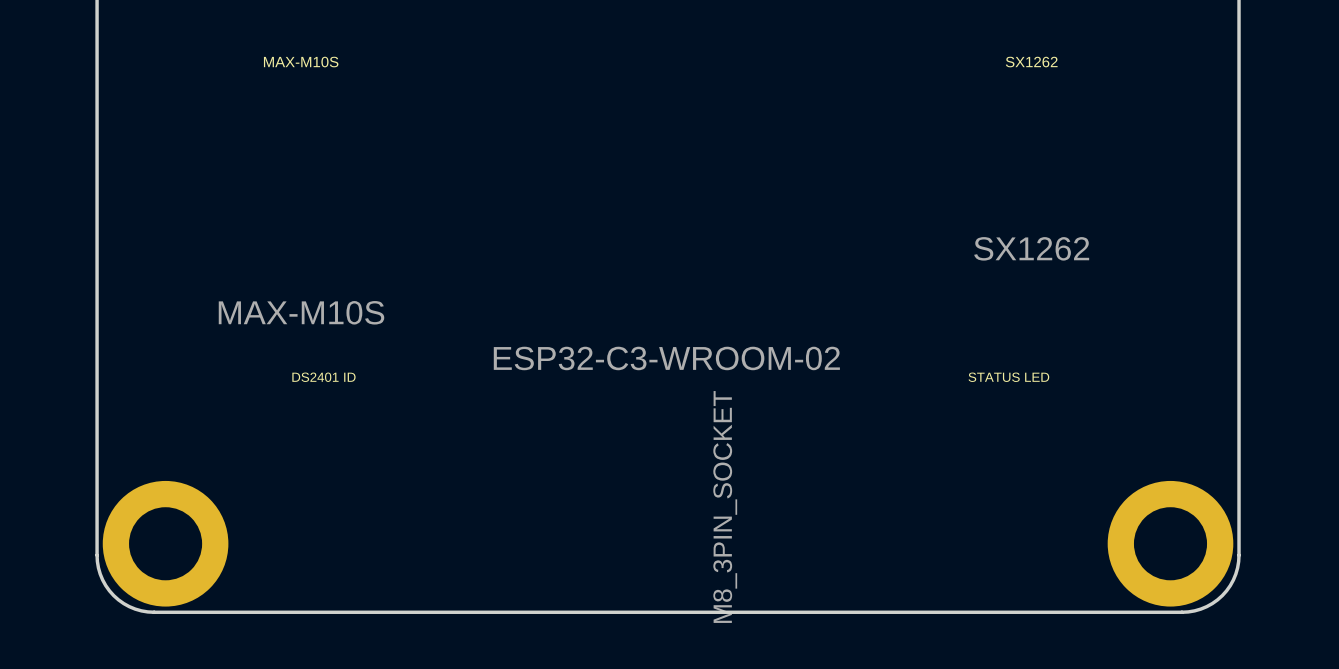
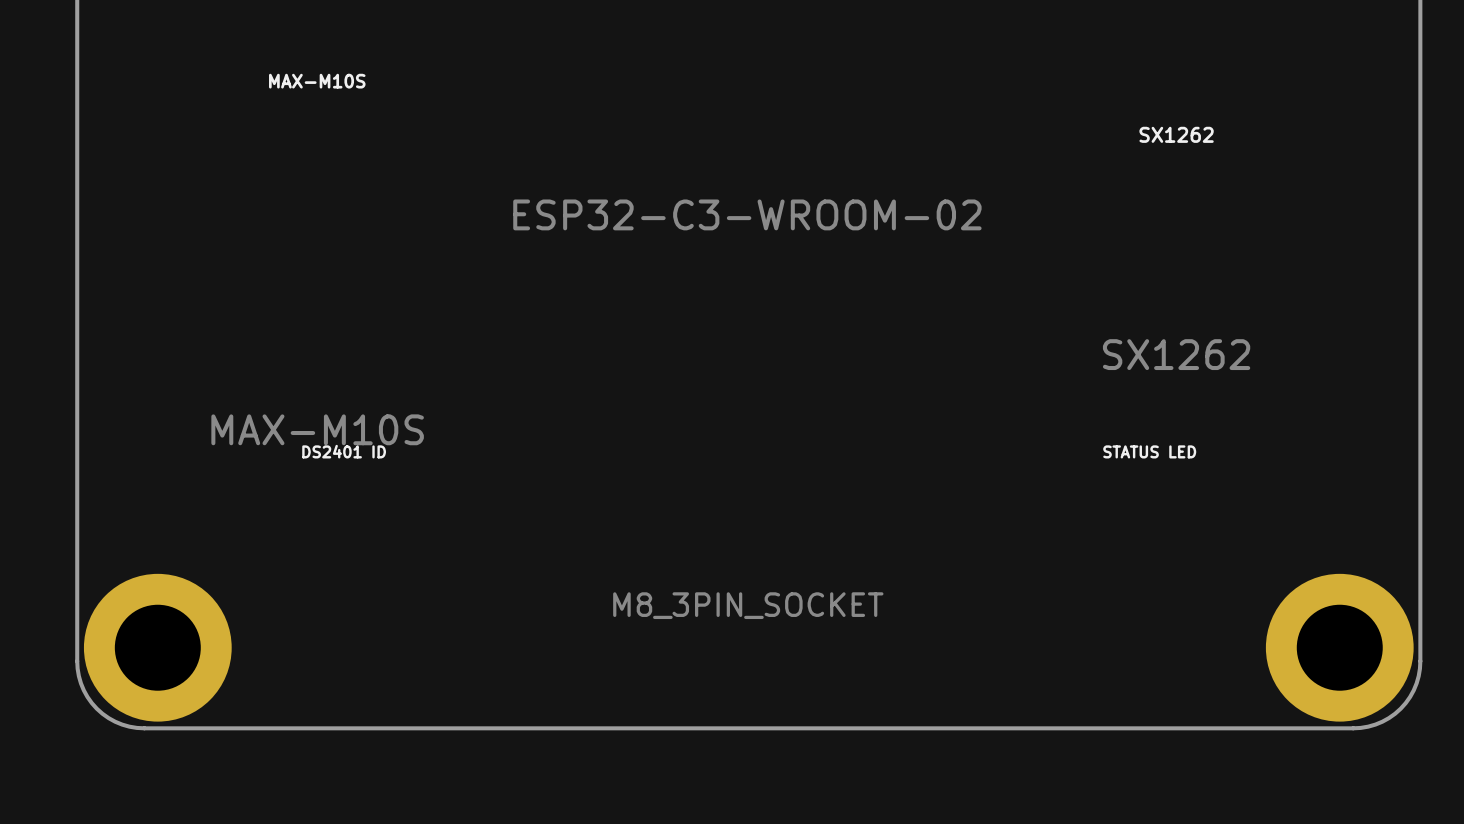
text position: SX1262 (1031, 62) -> SX1262 (1176, 134)
drawing position: (1031, 248) -> (1176, 354)
drawing position: (301, 312) -> (317, 429)
drawing position: (666, 358) -> (747, 214)
drawing position: (725, 507) -> (748, 605)

